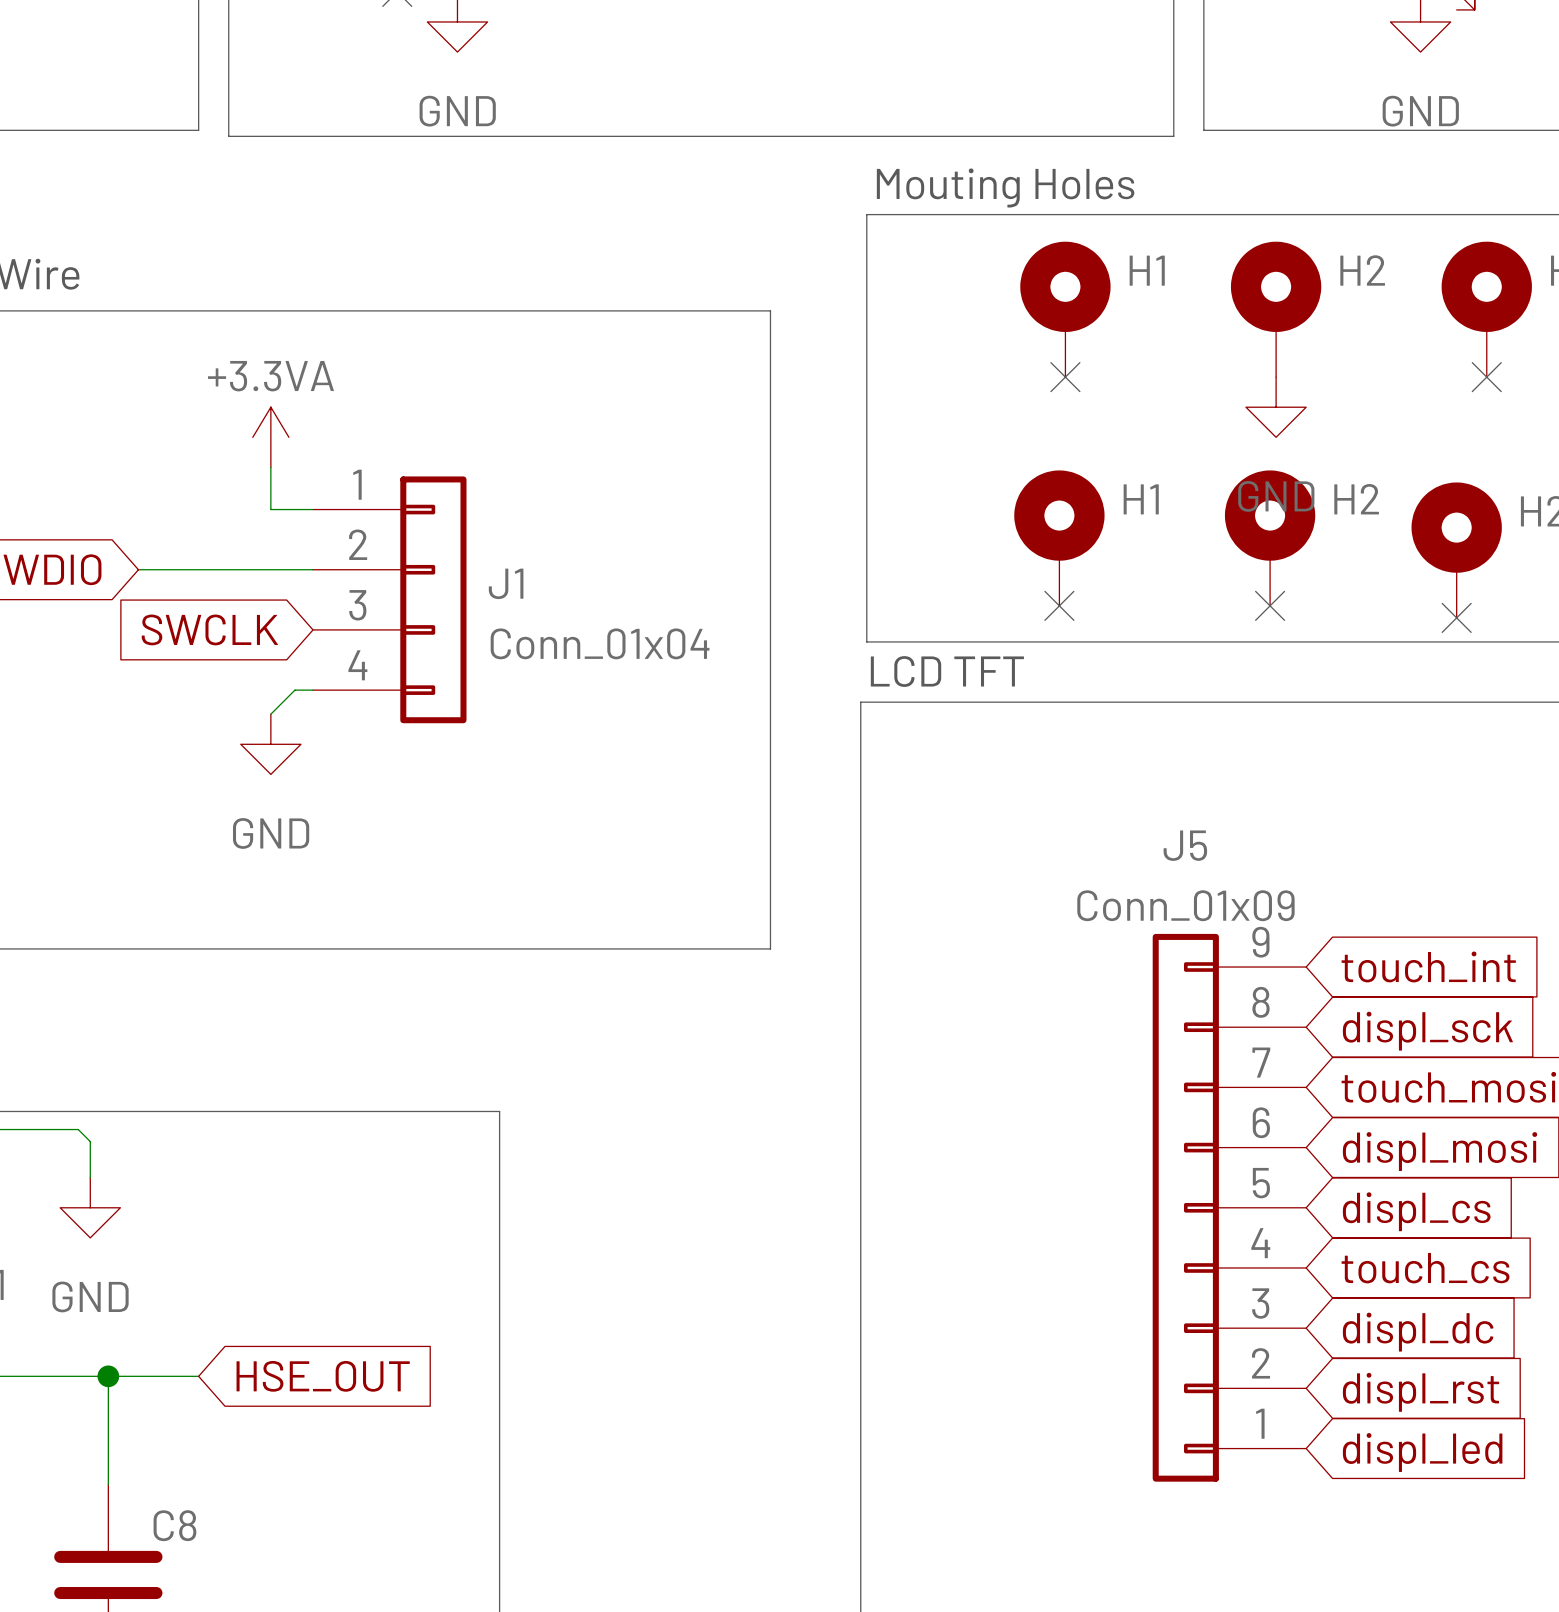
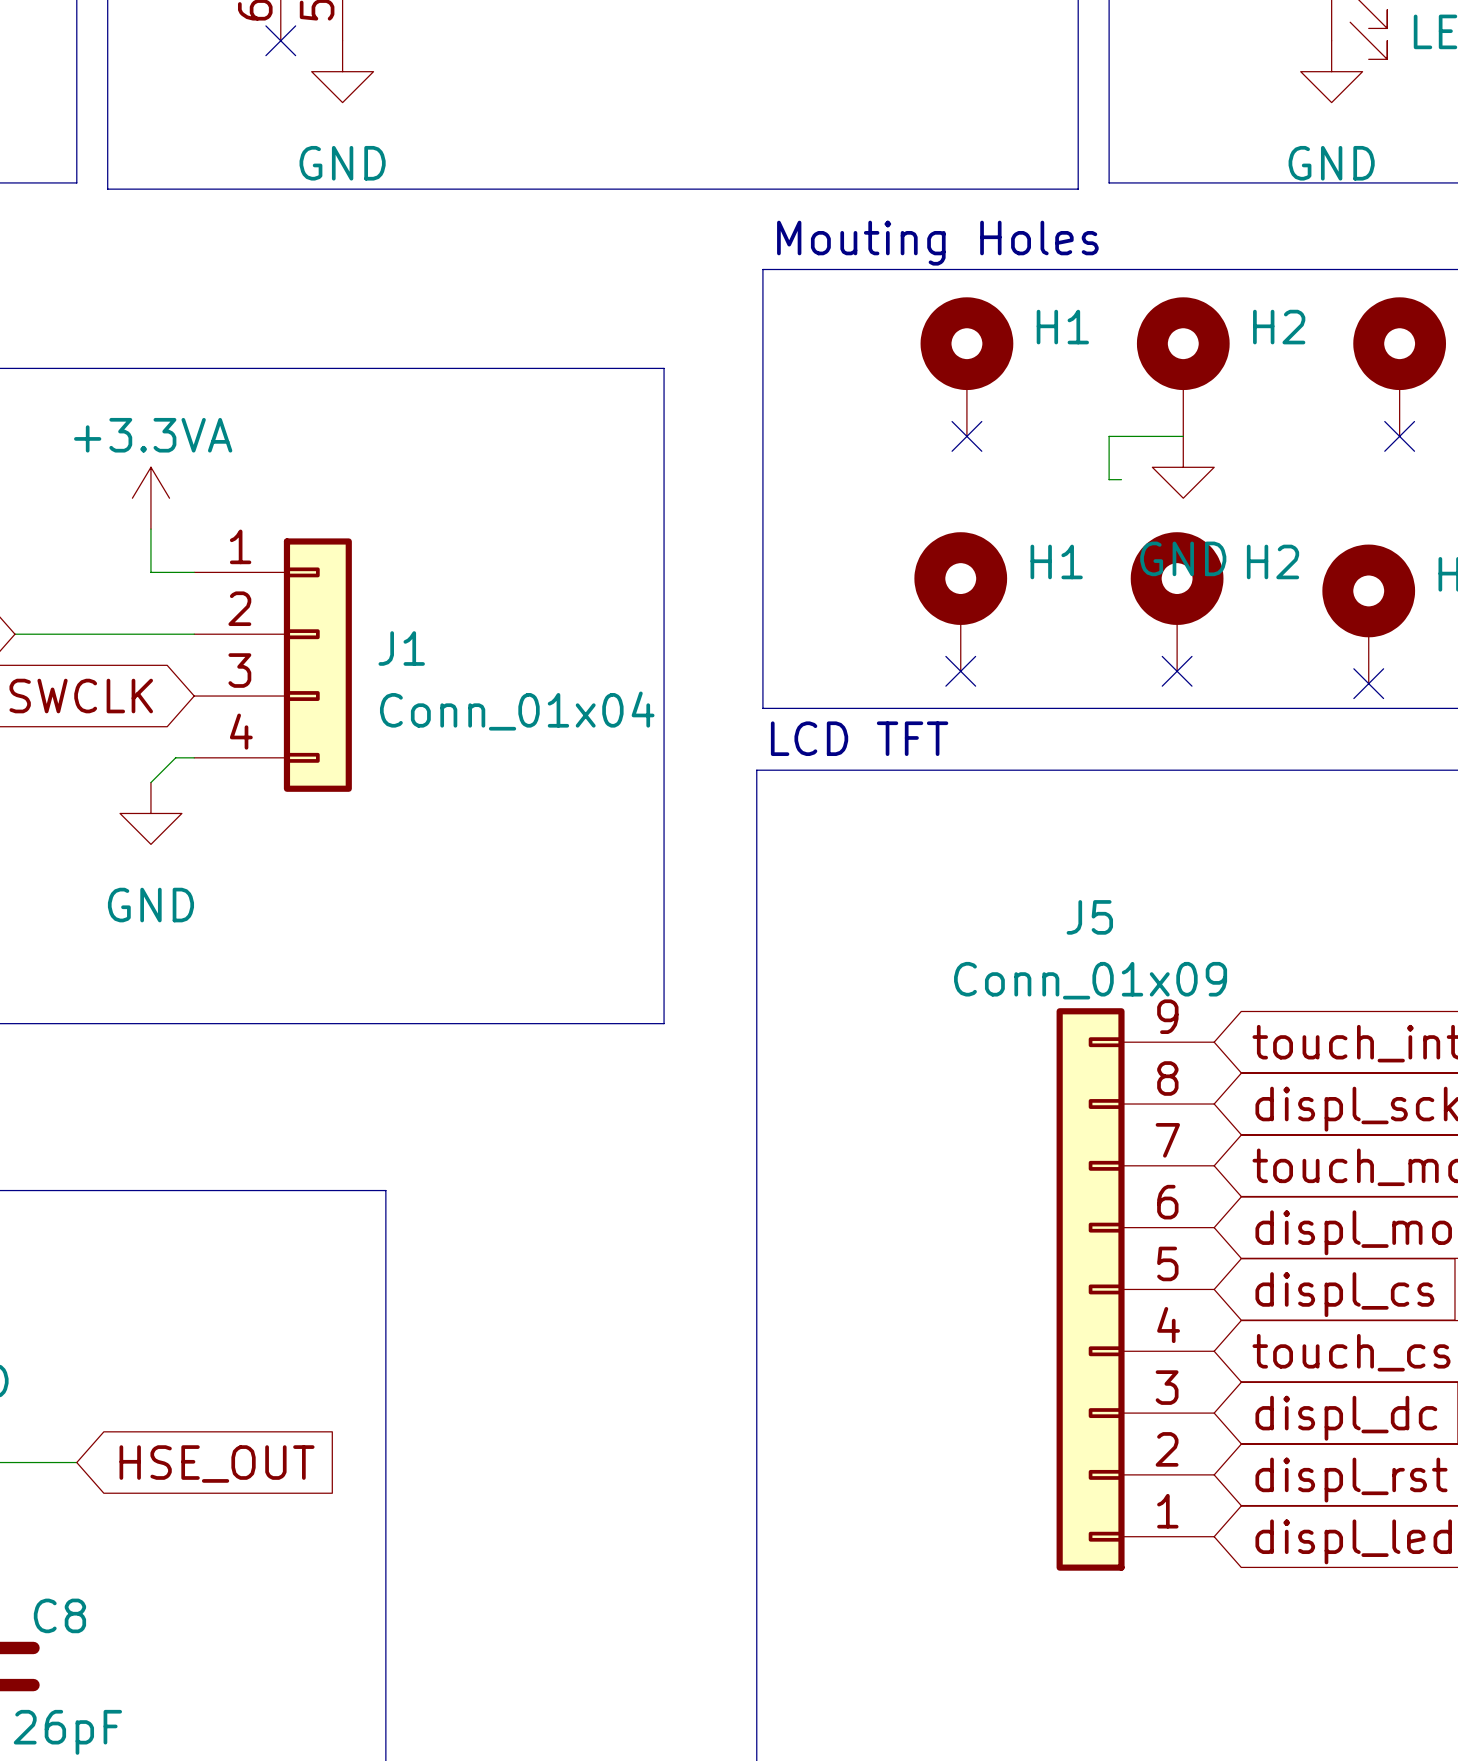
wire: none -> (1183, 436) (1109, 436) (1109, 479) (1121, 479)

